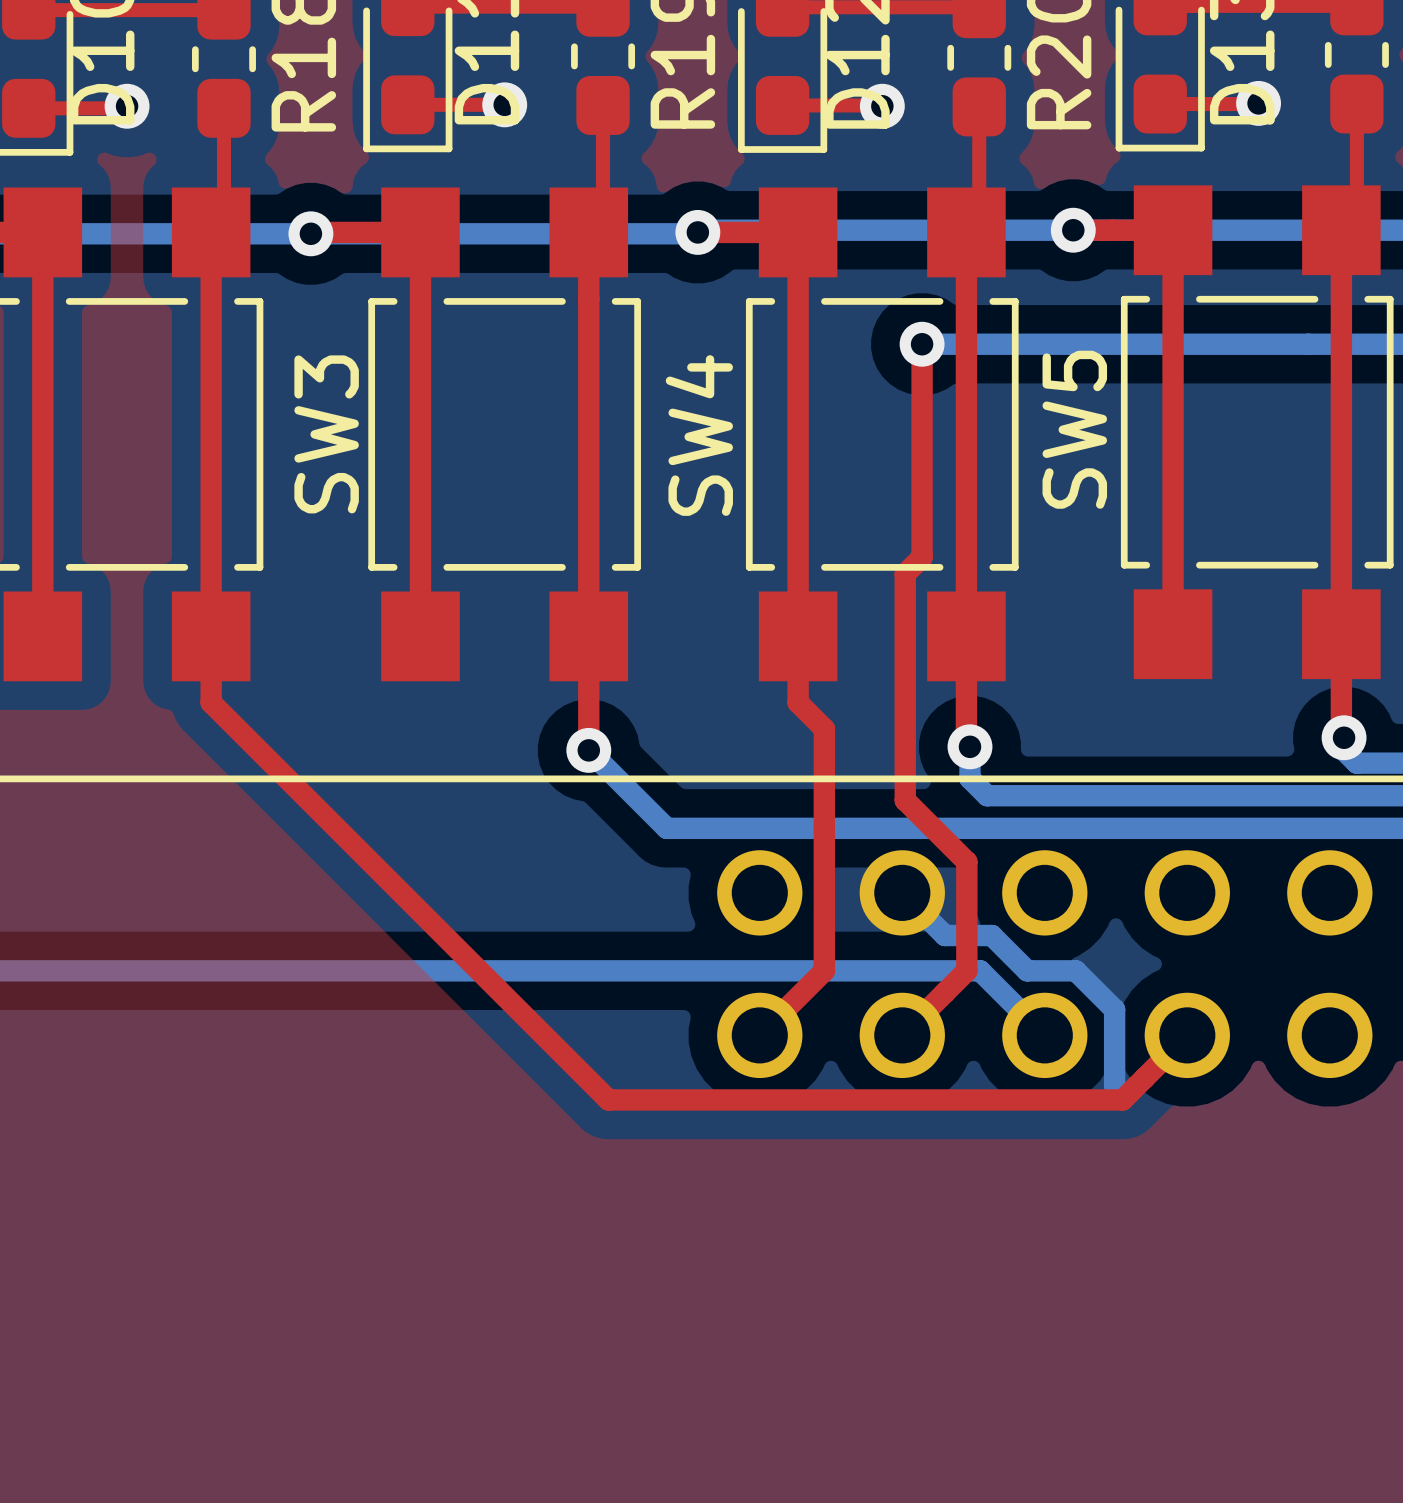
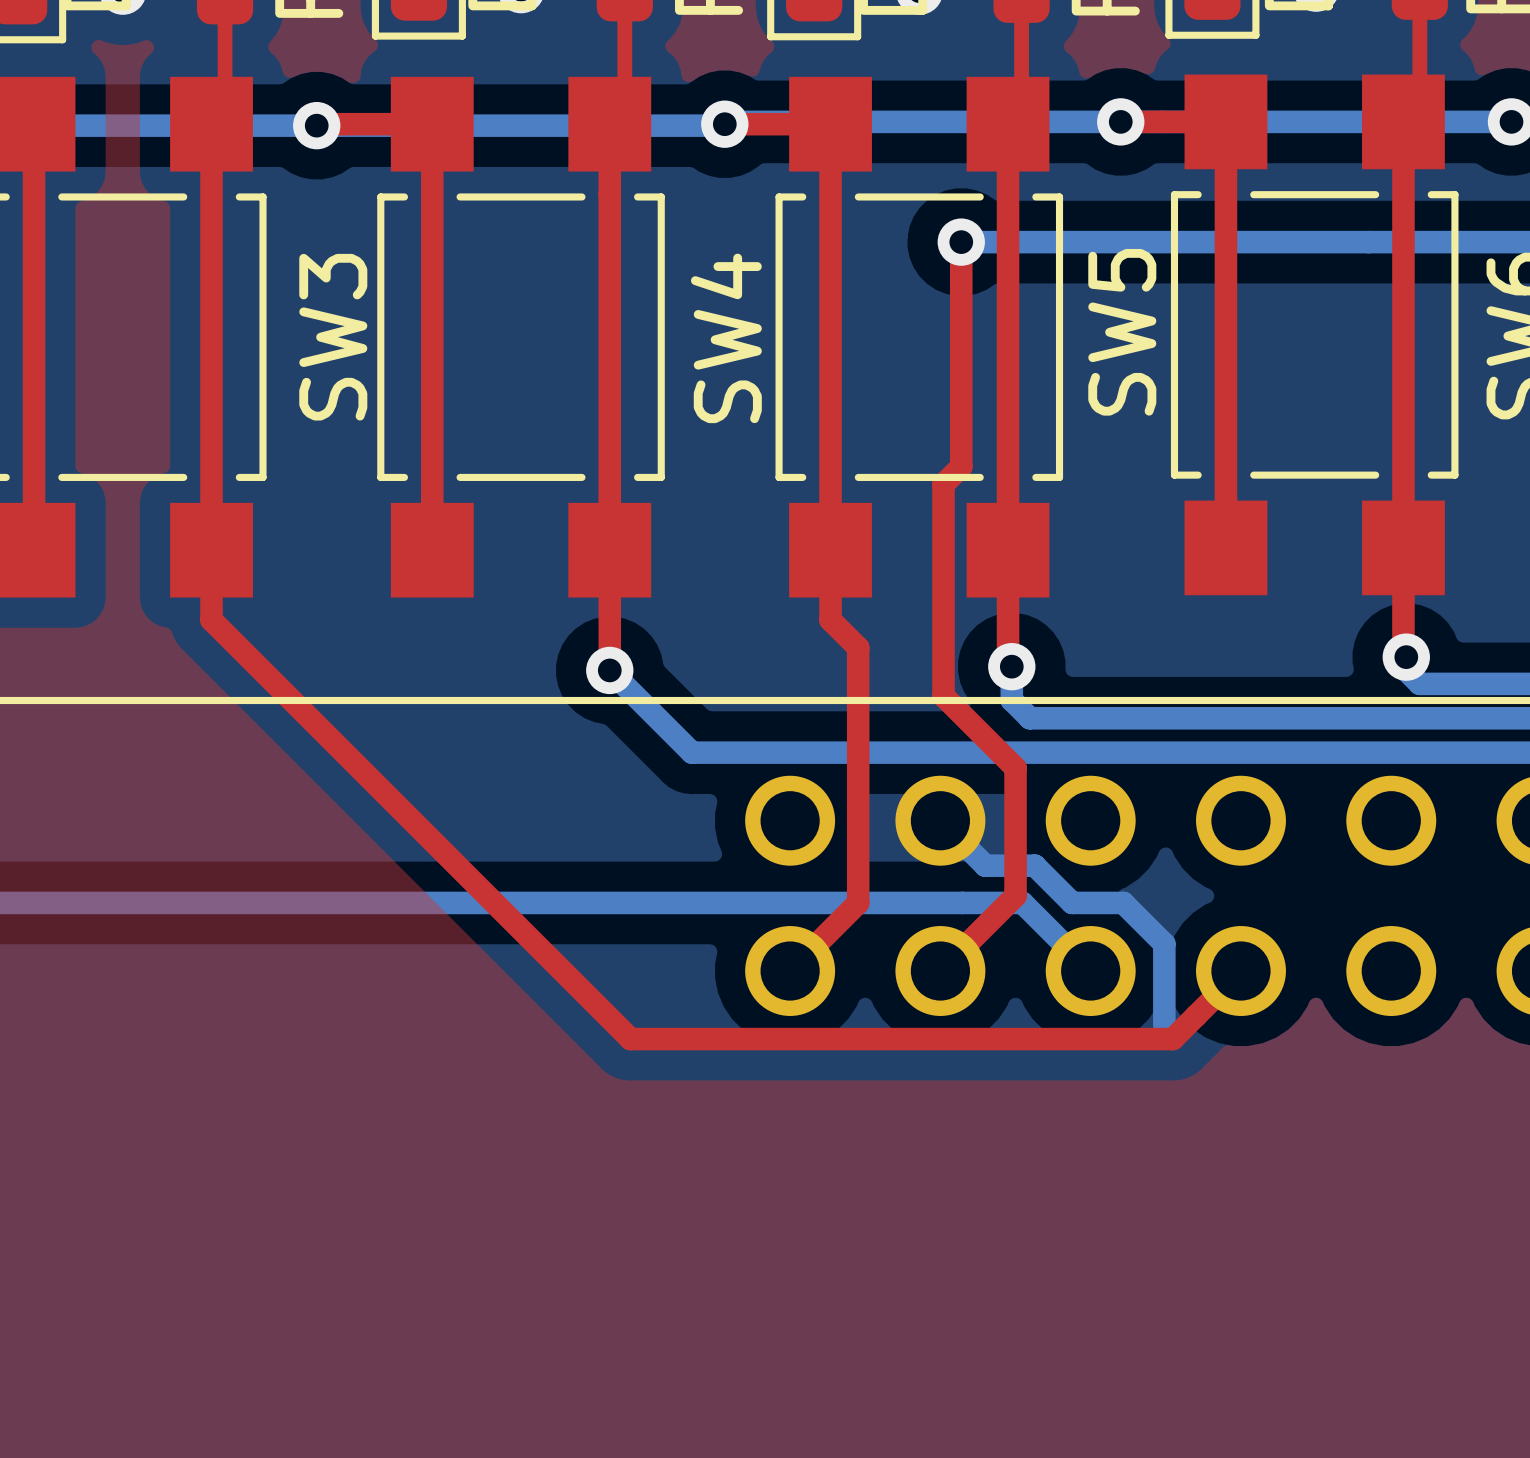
top track: (905, 774) (905, 800) (966, 861) (966, 970) -> (943, 696) (1015, 768) (1015, 895) (1008, 902)

